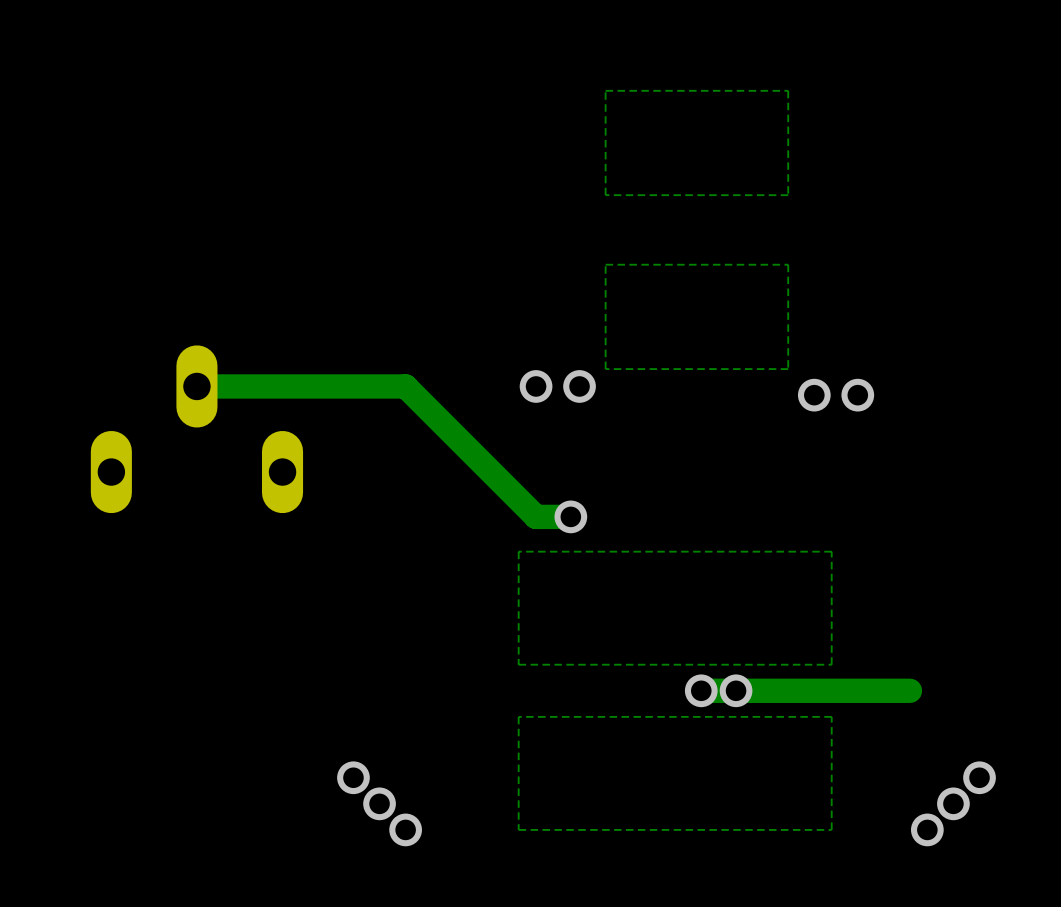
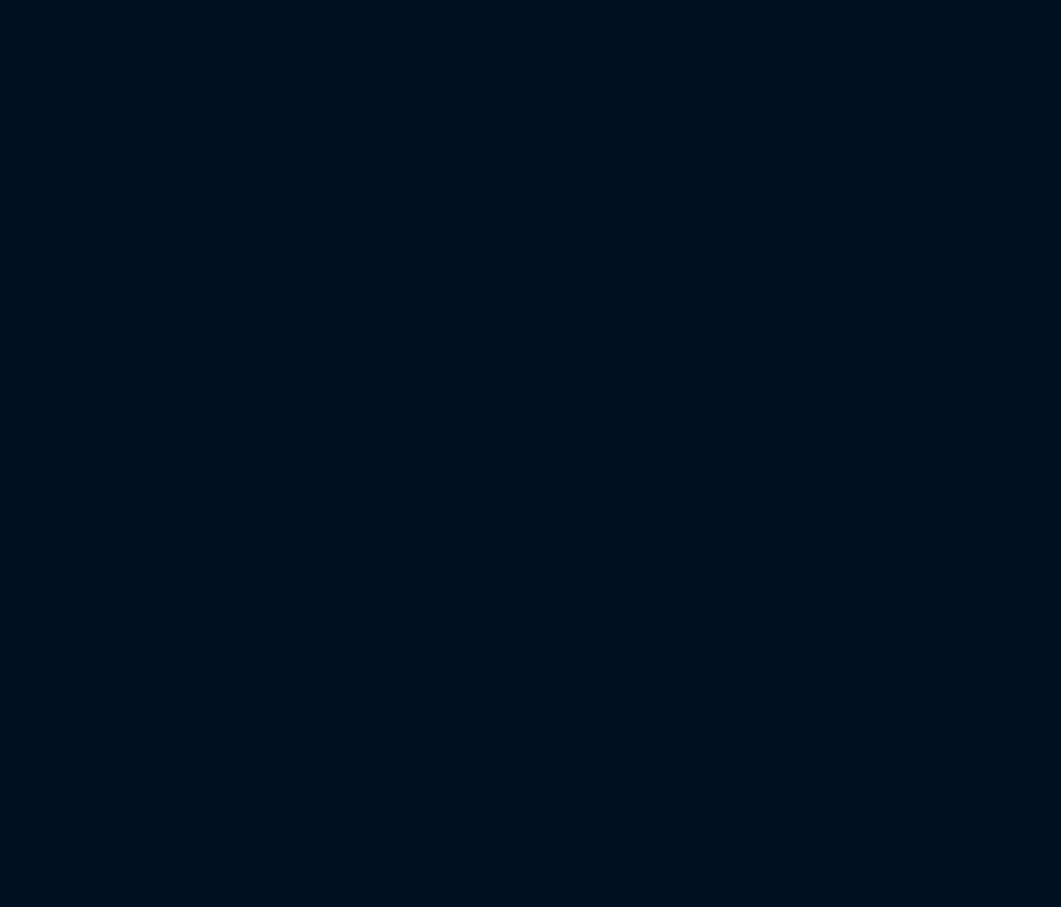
zone outline: (788, 90) (788, 195) (605, 195) (605, 90) (788, 90) -> none
zone outline: (788, 264) (605, 264) (605, 369) (788, 369) (788, 264) -> none
track: (196, 386) (405, 386) (536, 516) (570, 516) -> none
via: (536, 386) -> none
via: (579, 386) -> none
via: (814, 395) -> none
via: (857, 395) -> none
part: (196, 429) -> none
via: (570, 516) -> none
zone outline: (831, 551) (831, 664) (518, 664) (518, 551) (831, 551) -> none
via: (701, 690) -> none
via: (736, 690) -> none
track: (909, 690) (701, 690) -> none
zone outline: (831, 716) (831, 829) (518, 829) (518, 716) (831, 716) -> none
via: (353, 777) -> none
via: (979, 777) -> none
via: (379, 803) -> none
via: (953, 803) -> none
via: (405, 829) -> none
via: (927, 829) -> none

